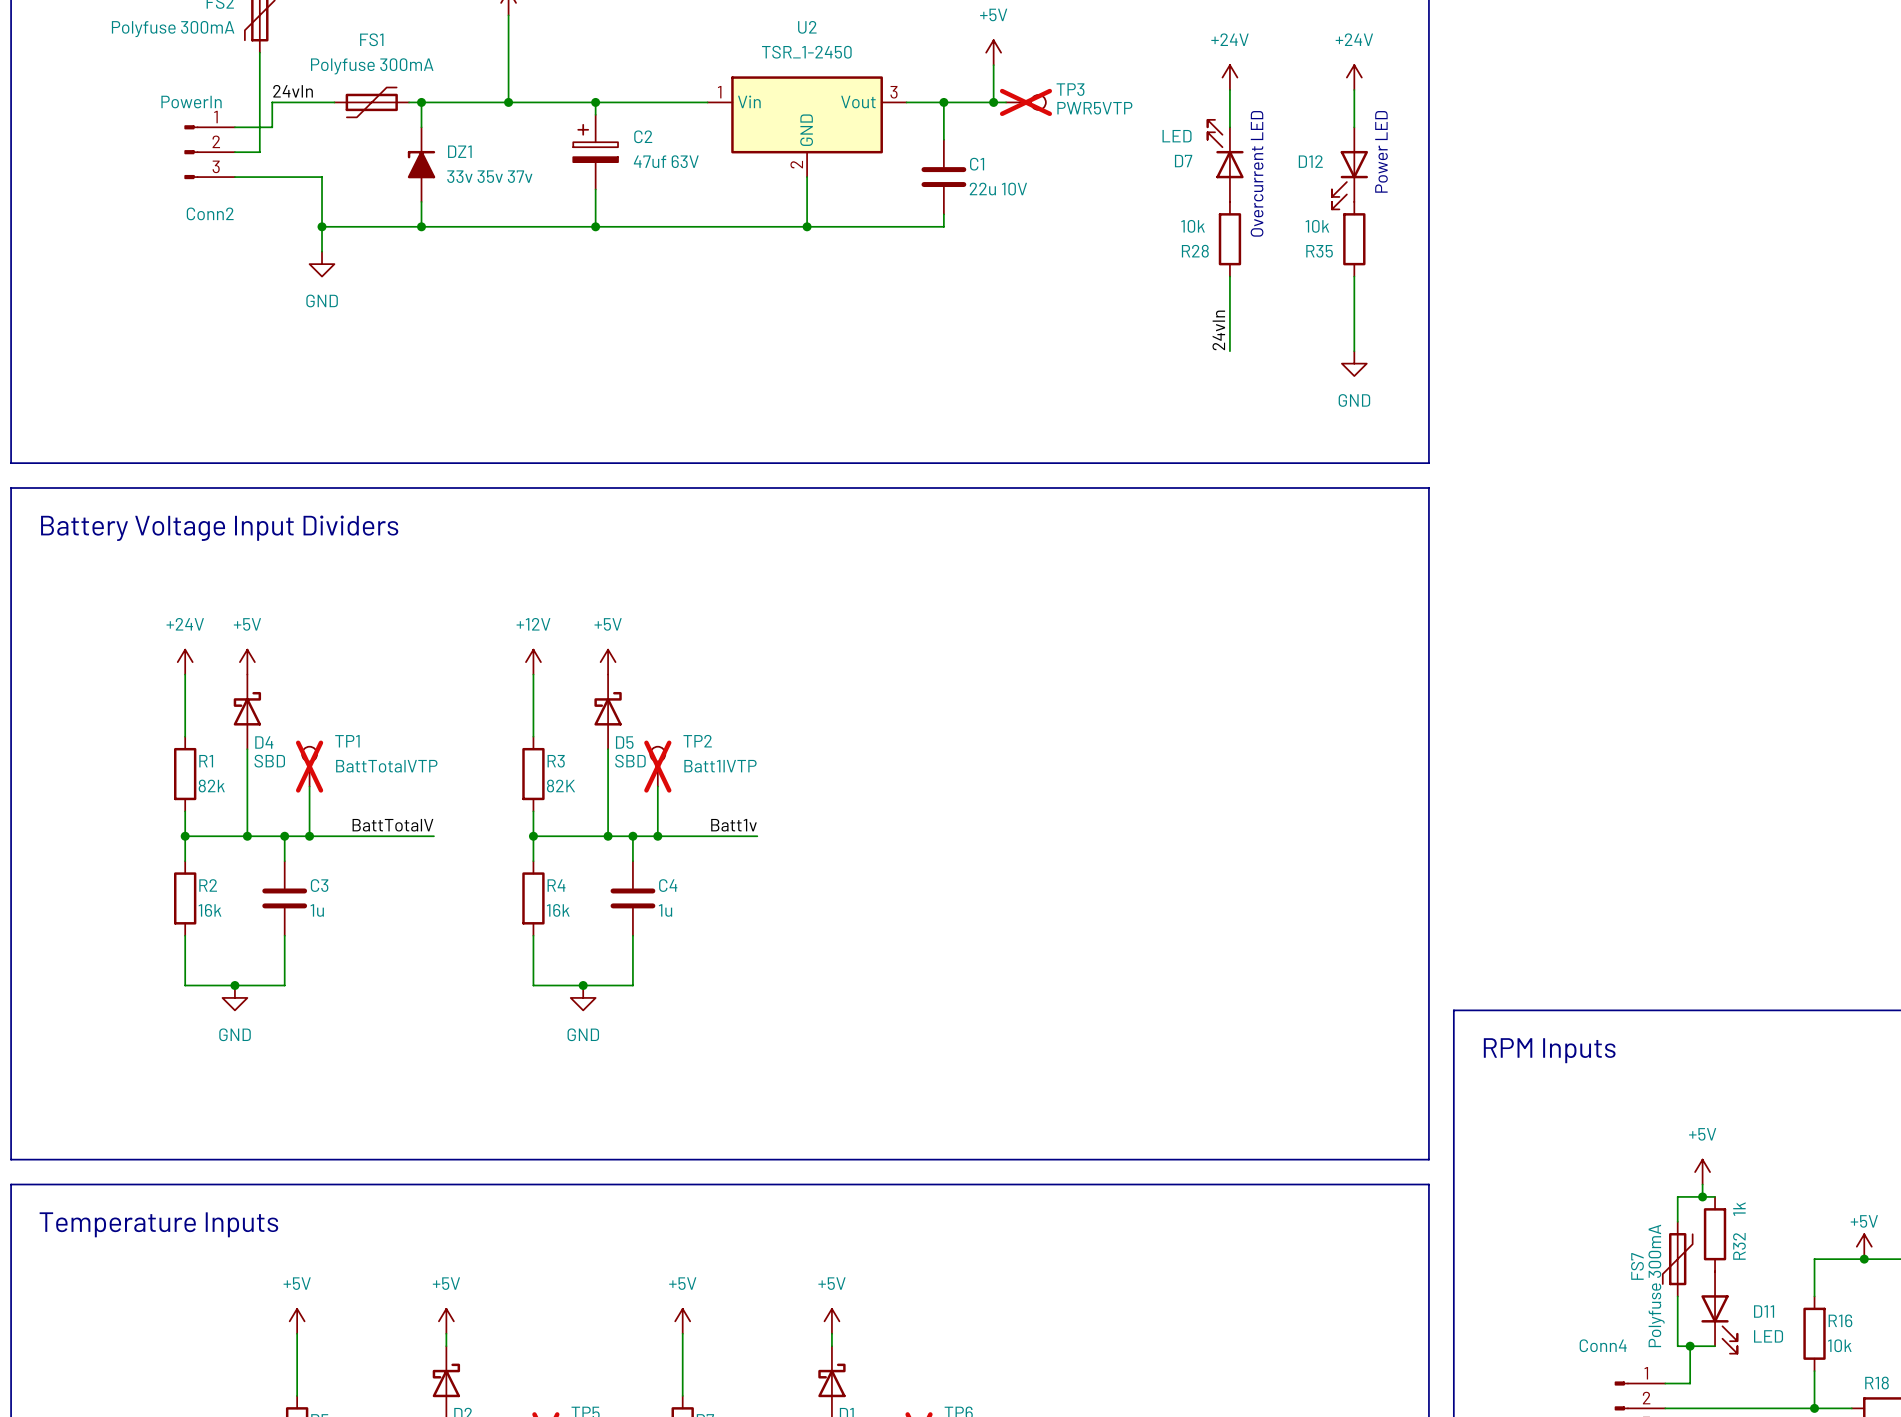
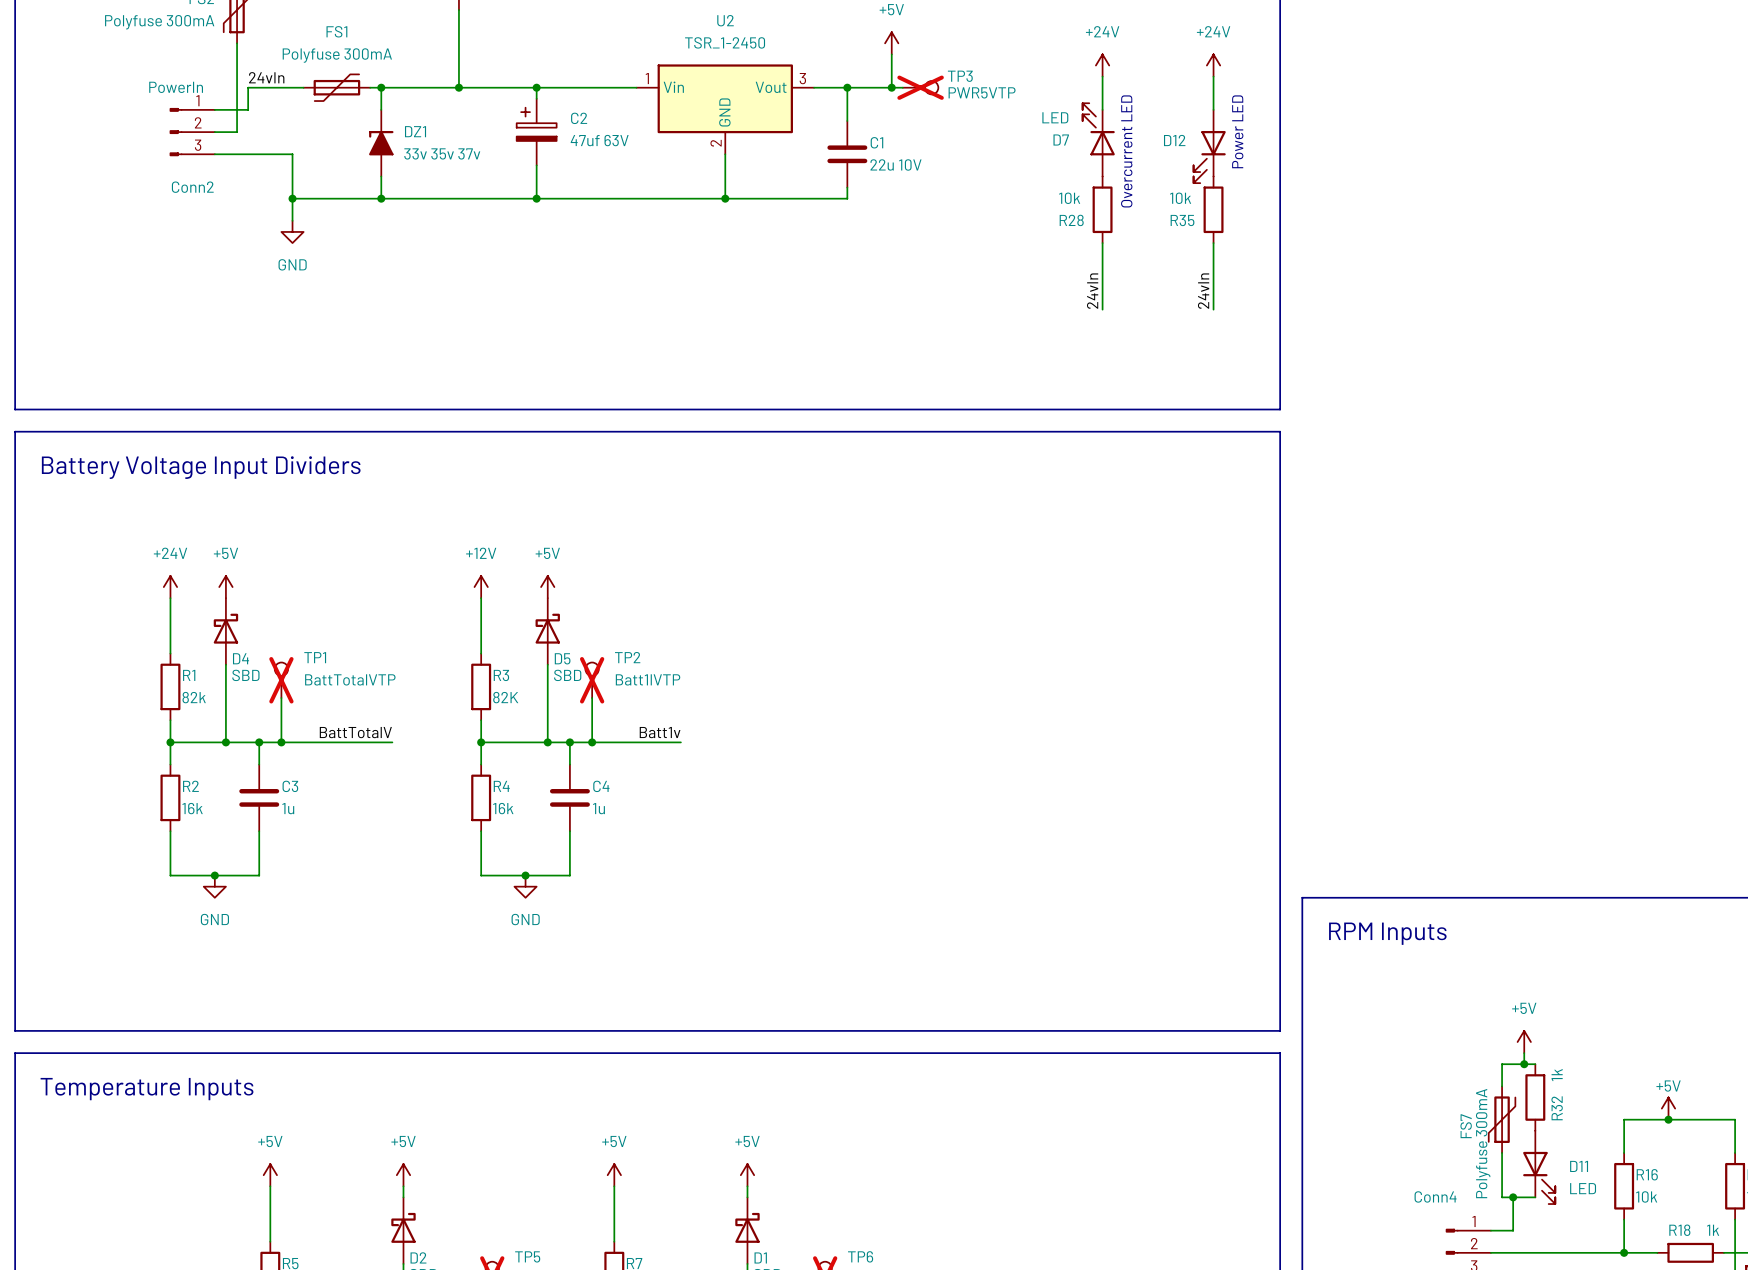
label: none -> 24vIn (1203, 291)
power symbol: GND (1354, 363) -> none

